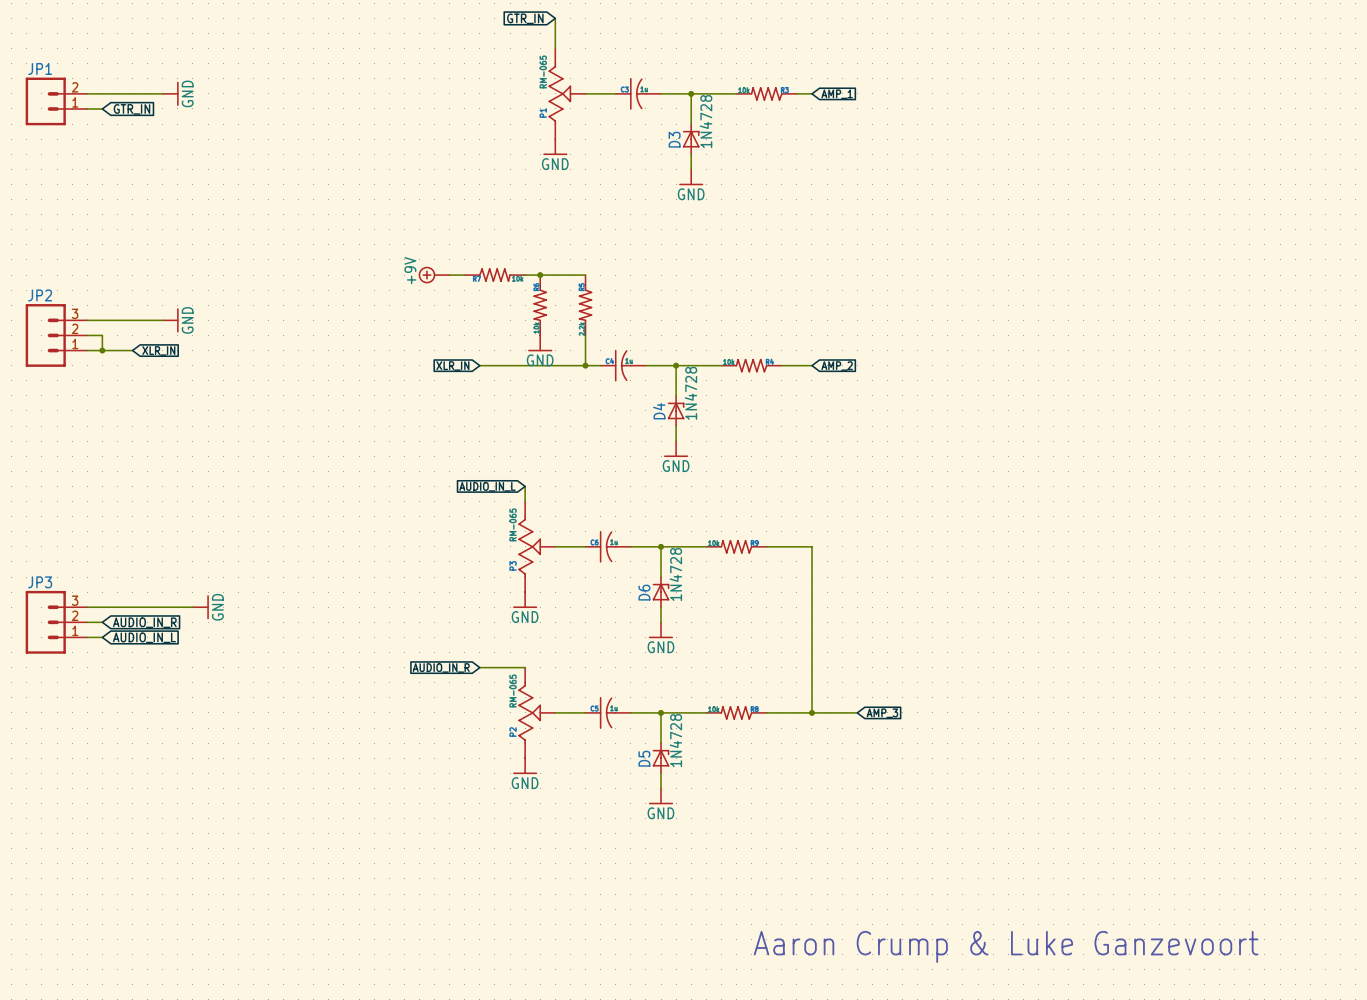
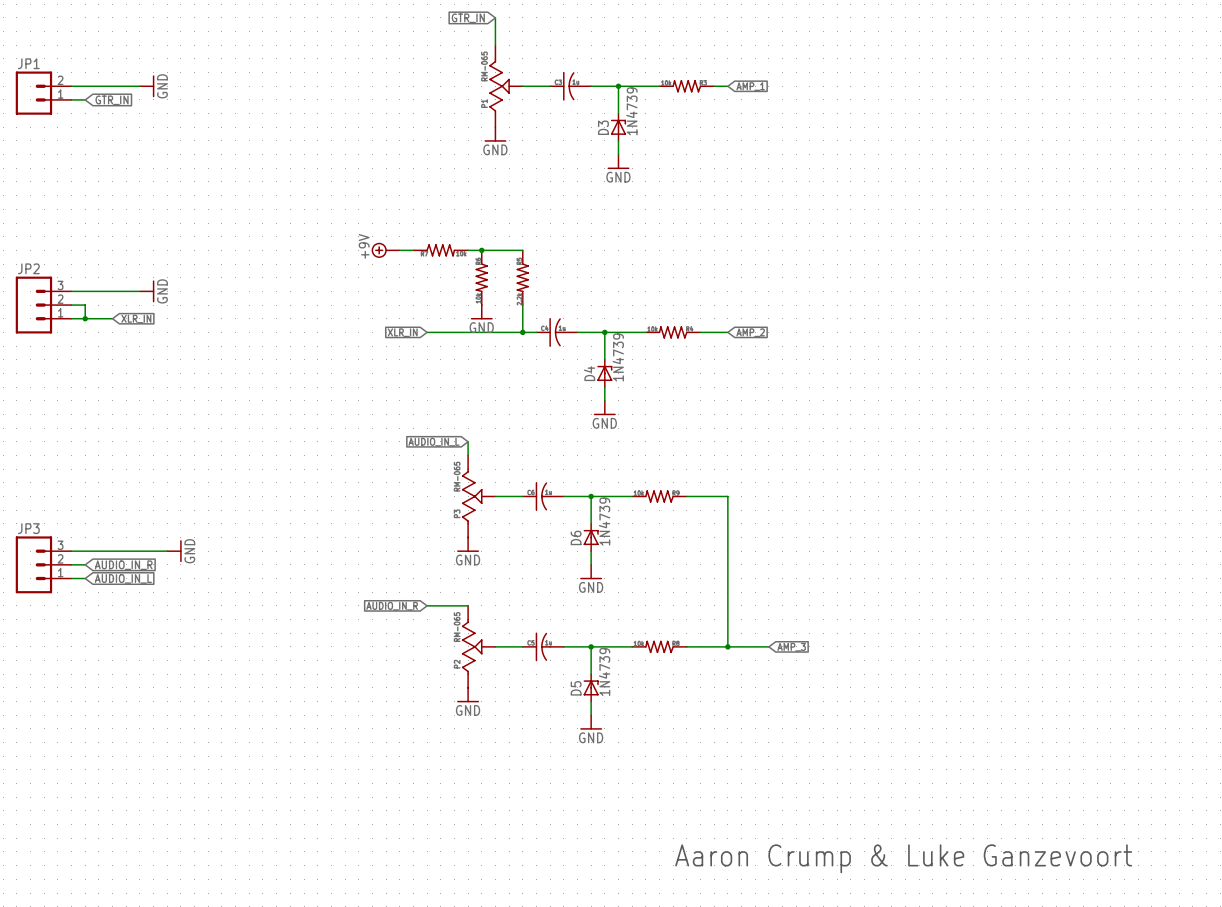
D3 value: 1N4728 (706, 121) -> 1N4739 (631, 111)
D4 value: 1N4728 (690, 393) -> 1N4739 (618, 357)
D6 value: 1N4728 (675, 574) -> 1N4739 (604, 521)
D5 value: 1N4728 (675, 740) -> 1N4739 (604, 671)

